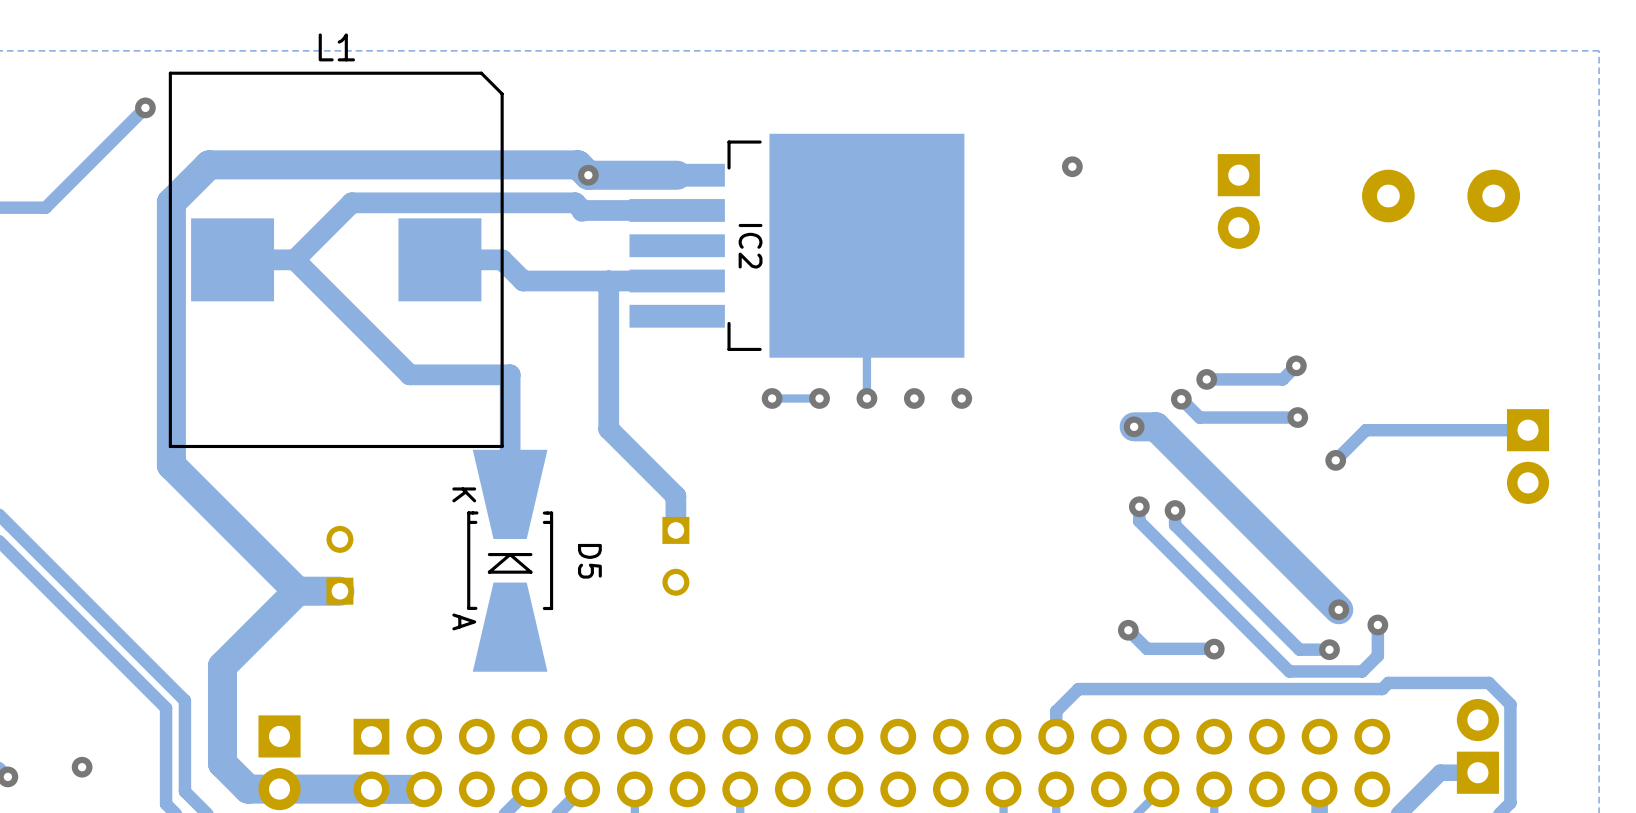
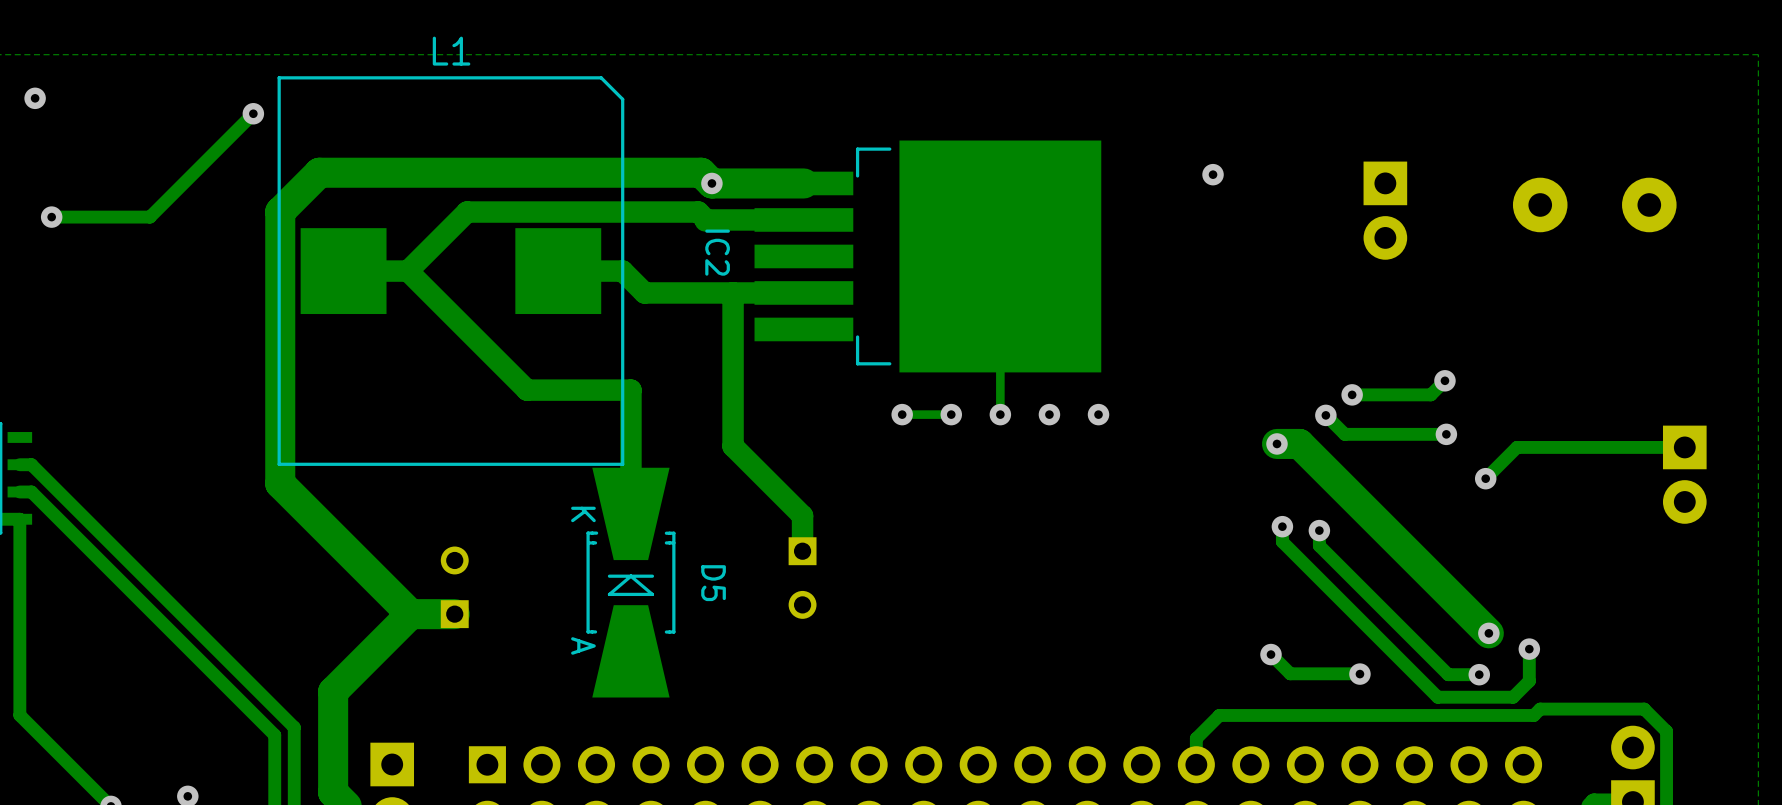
IC2 name position: IC2 (750, 246) -> IC2 (717, 252)

